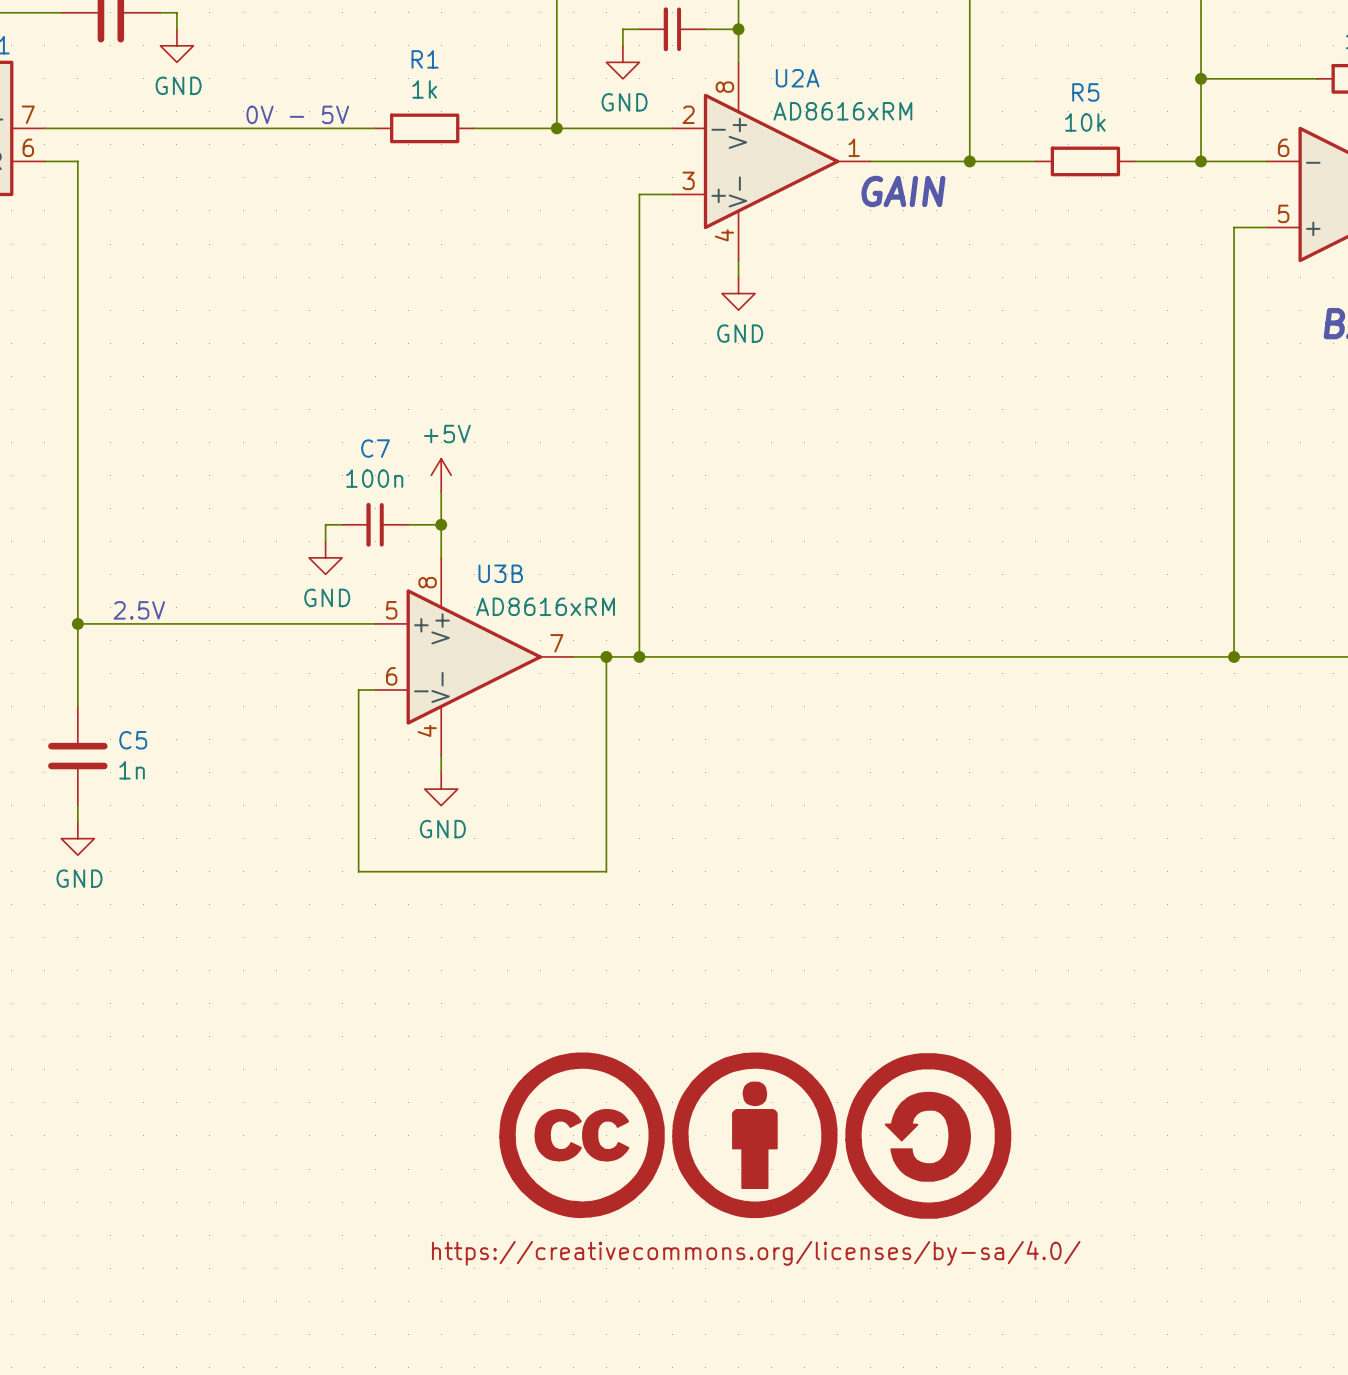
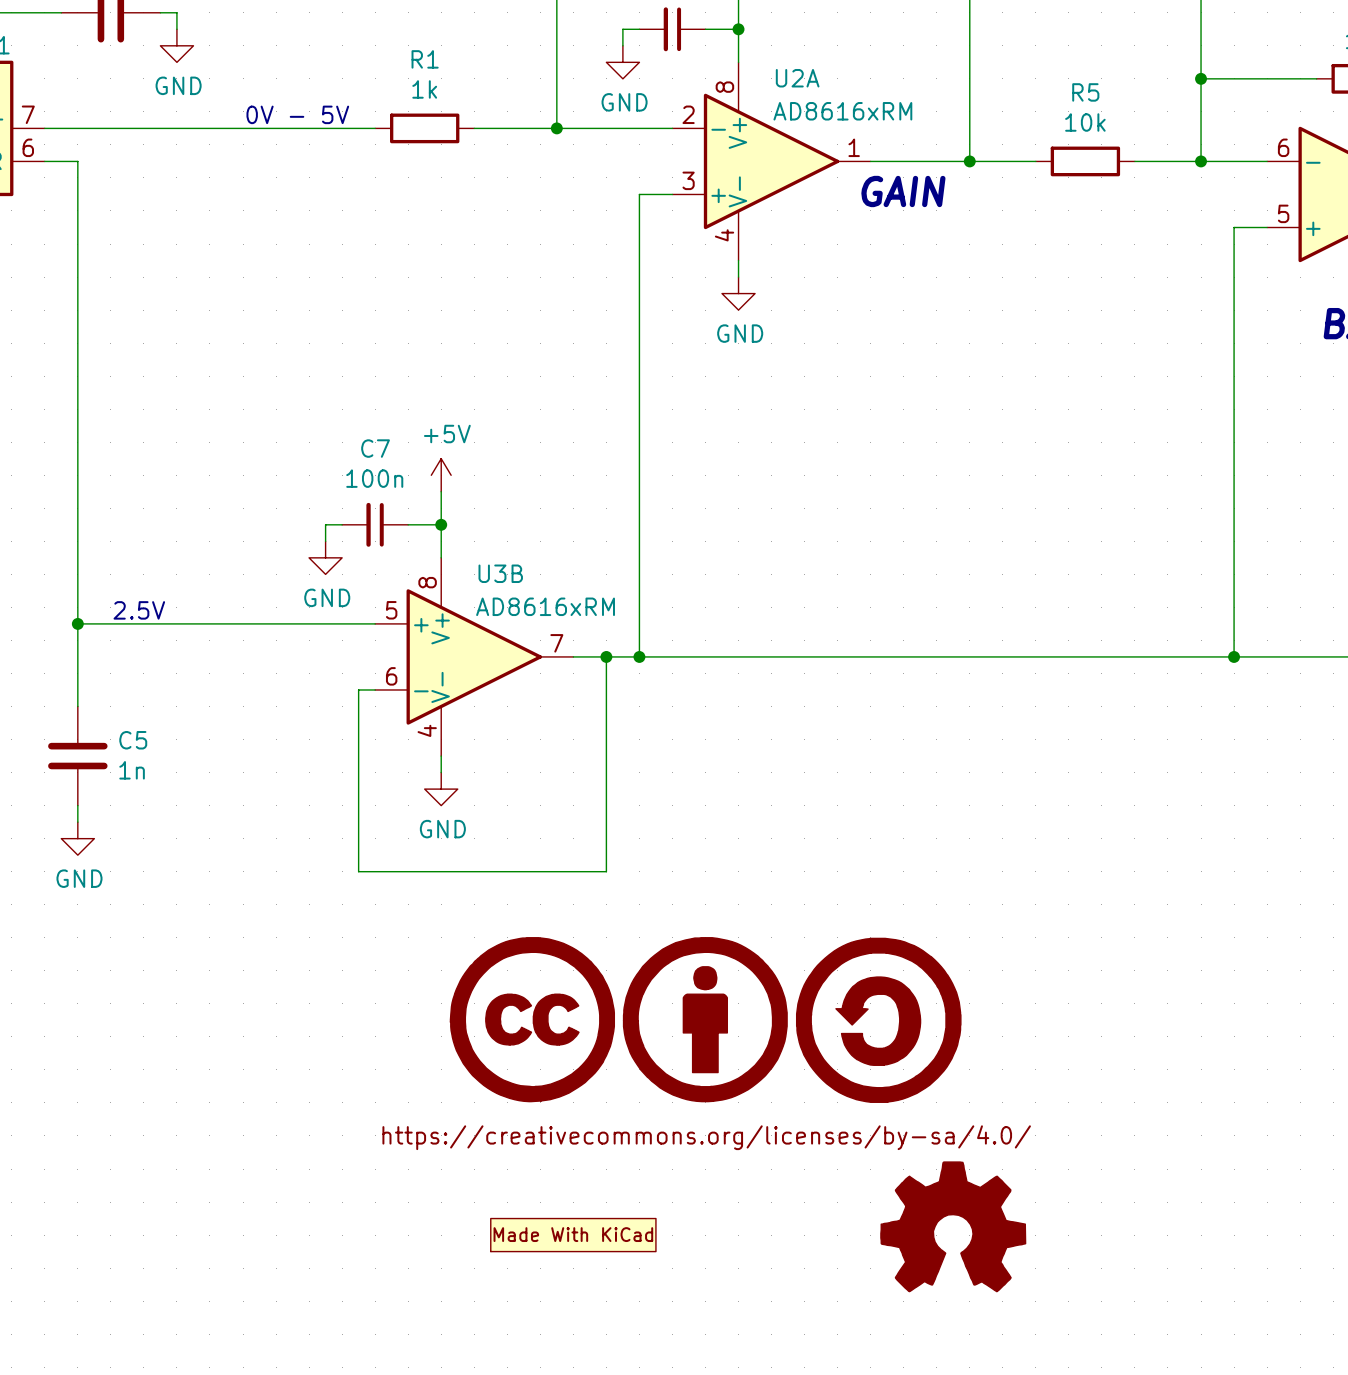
part position: (755, 1135) -> (705, 1020)
part: none -> (953, 1226)
part: none -> (573, 1235)

